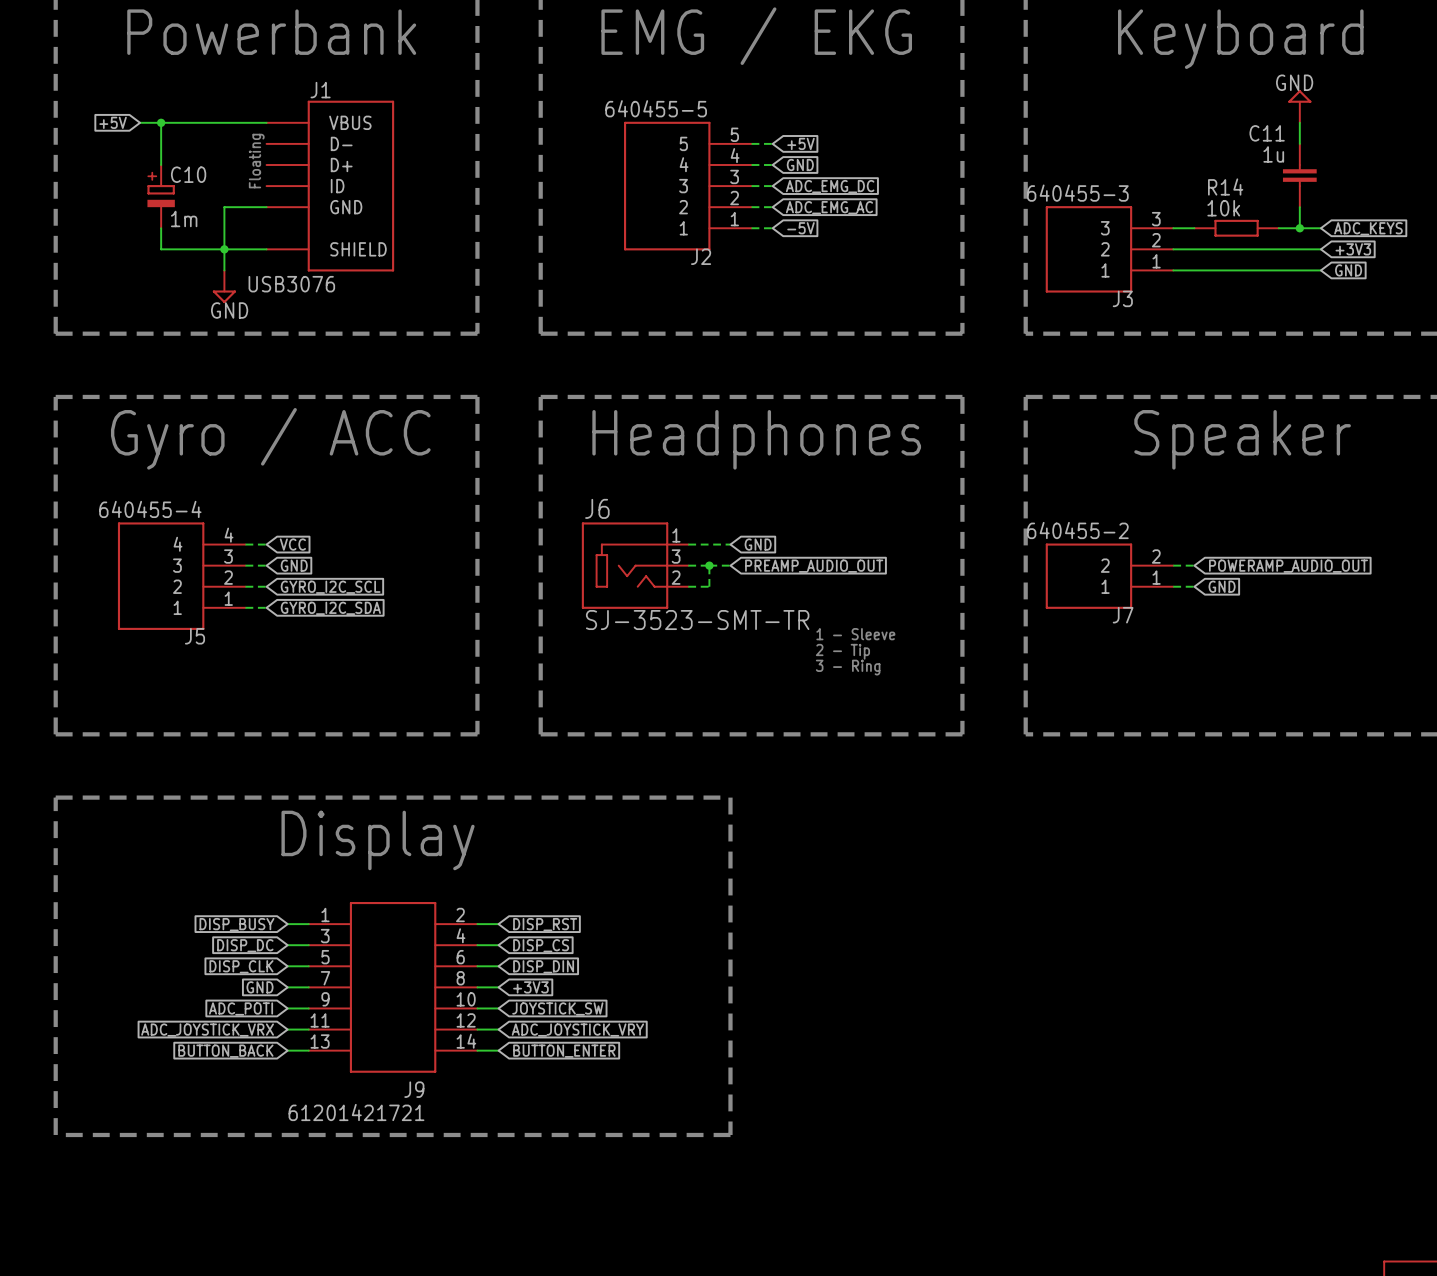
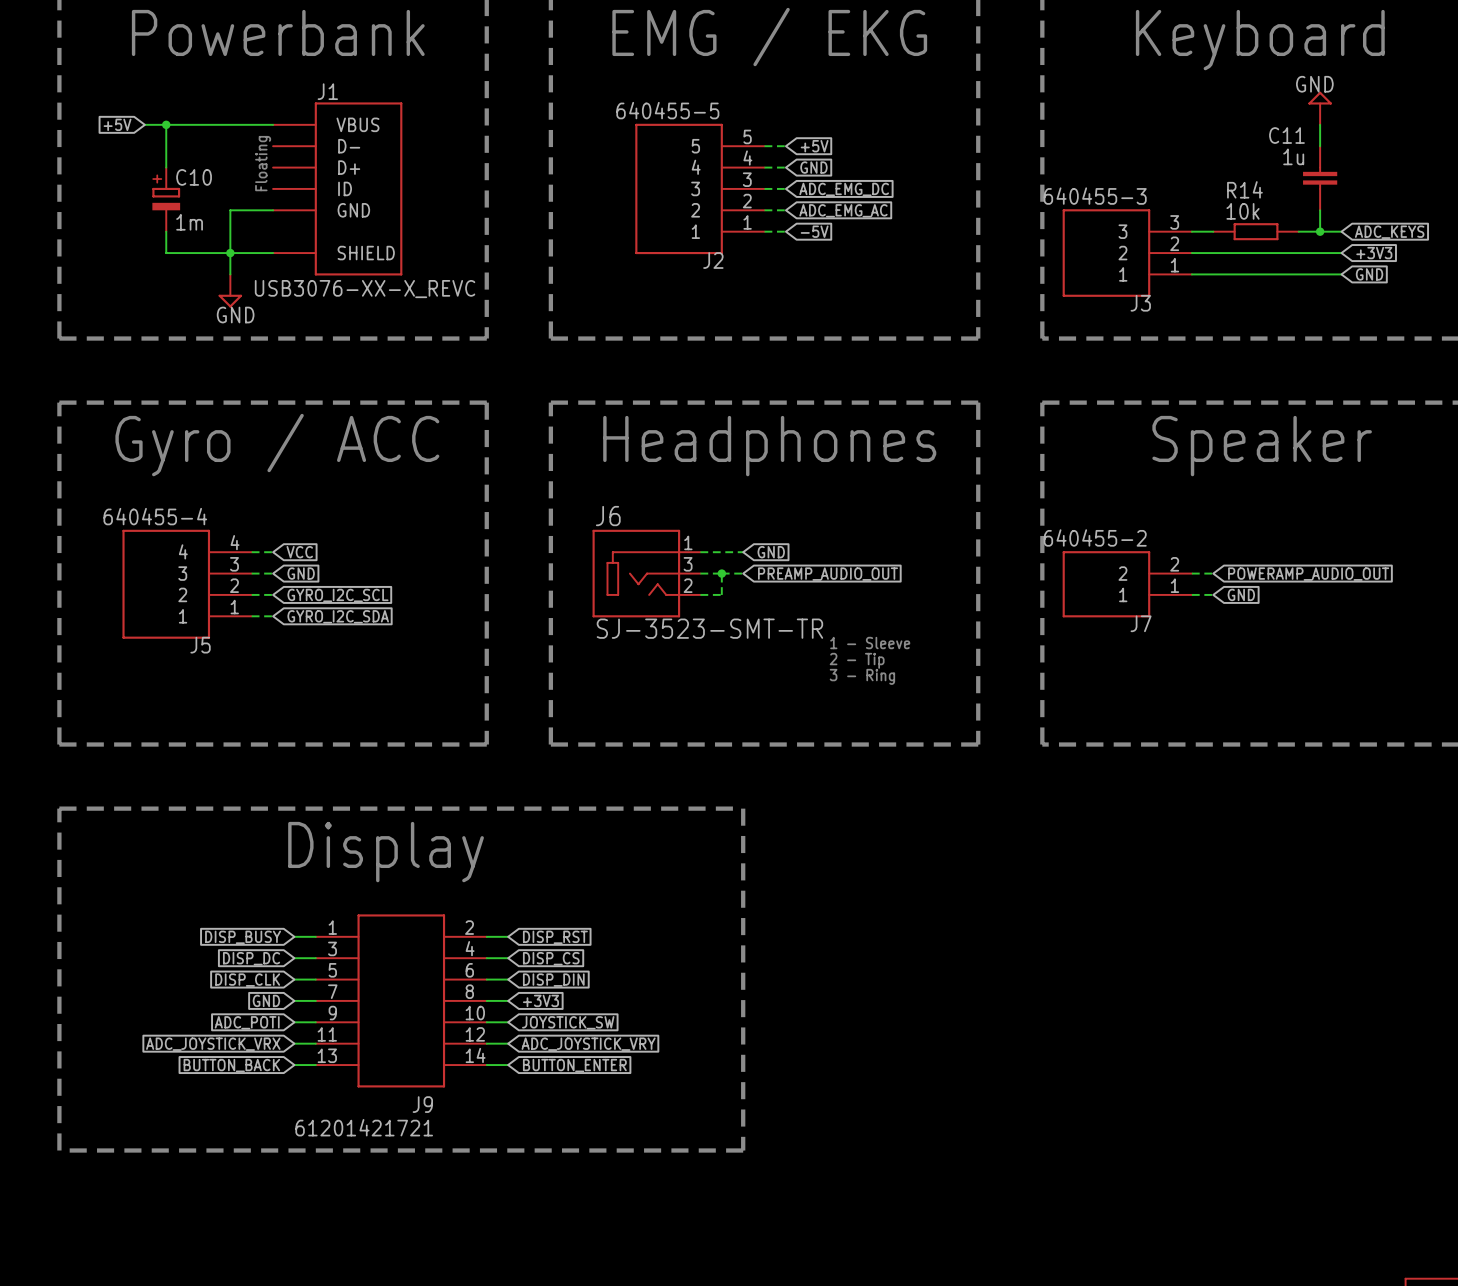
J1 value: USB3076 (291, 284) -> USB3076-XX-X_REVC (365, 289)

